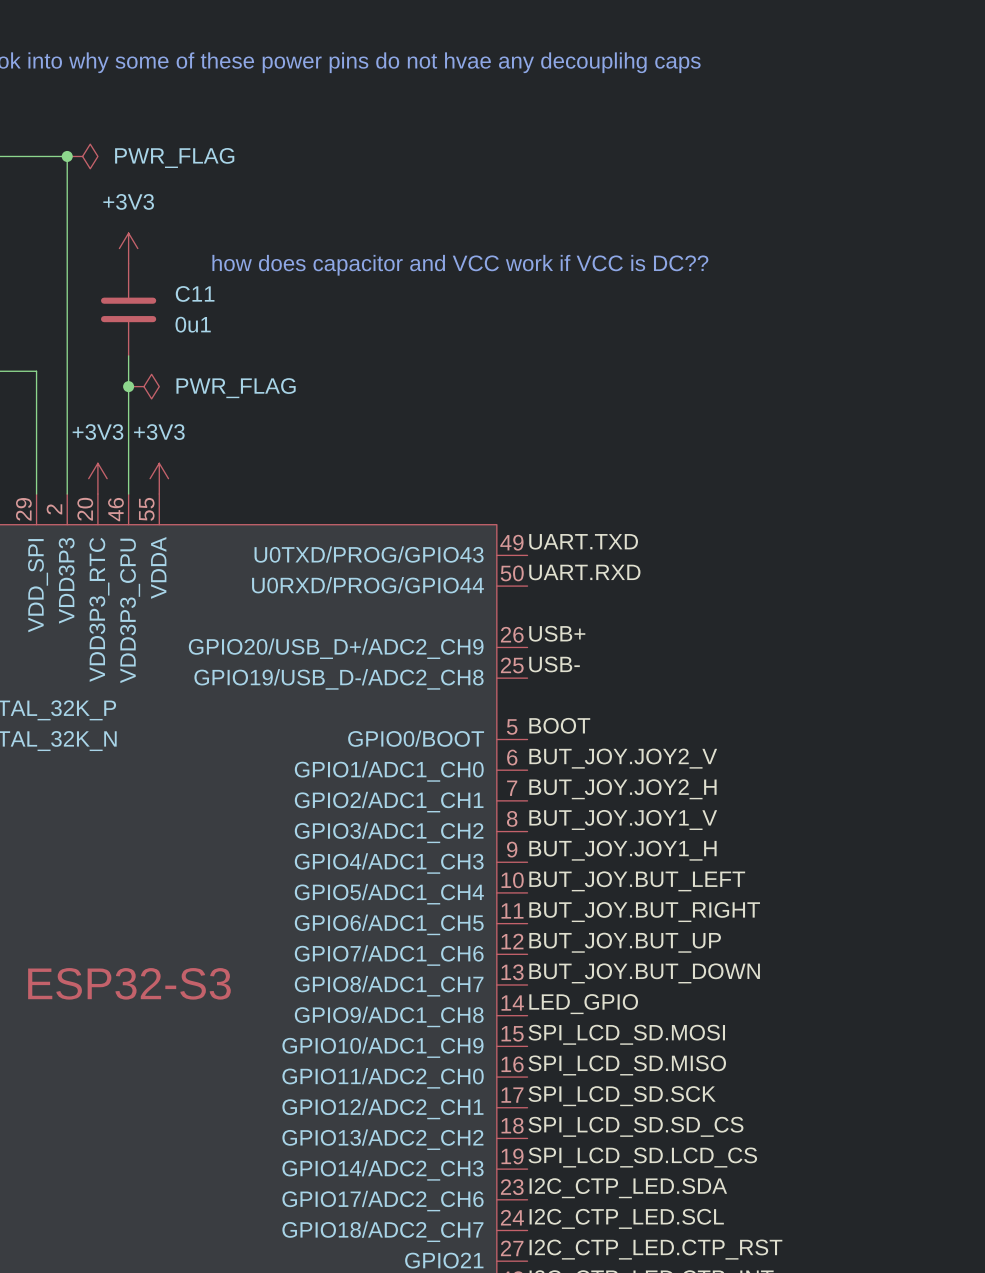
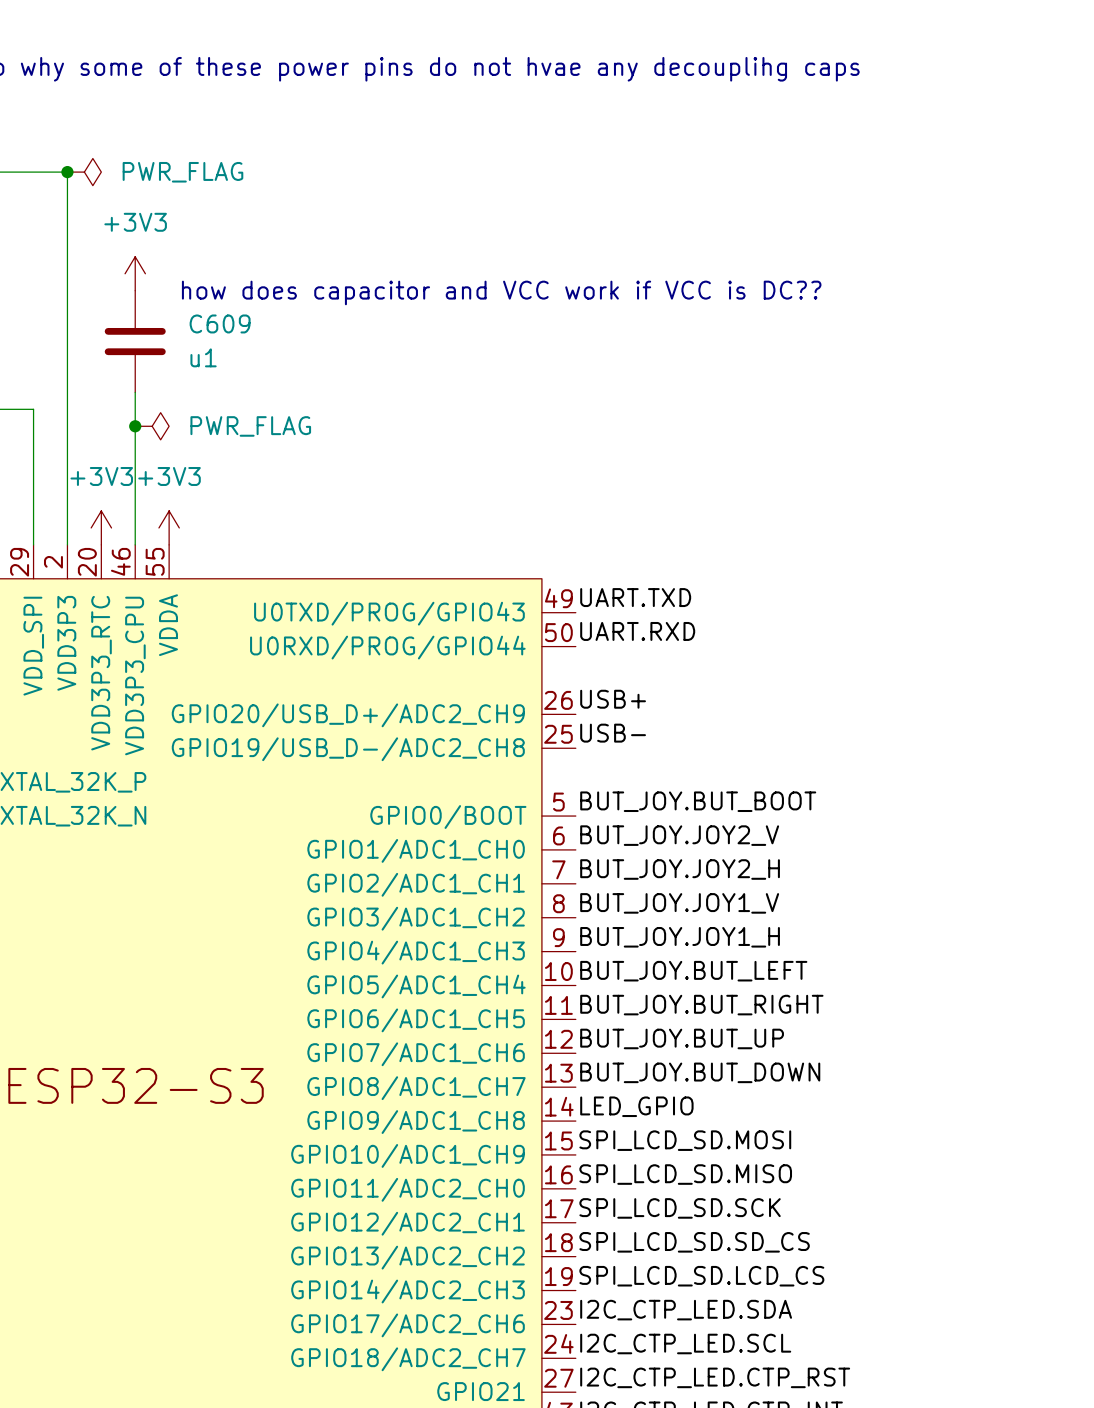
C11 name: C11 (195, 293) -> C609 (220, 323)
C11 value: 0u1 (193, 324) -> u1 (203, 357)
label: BOOT (559, 725) -> BUT_JOY.BUT_BOOT (698, 801)

